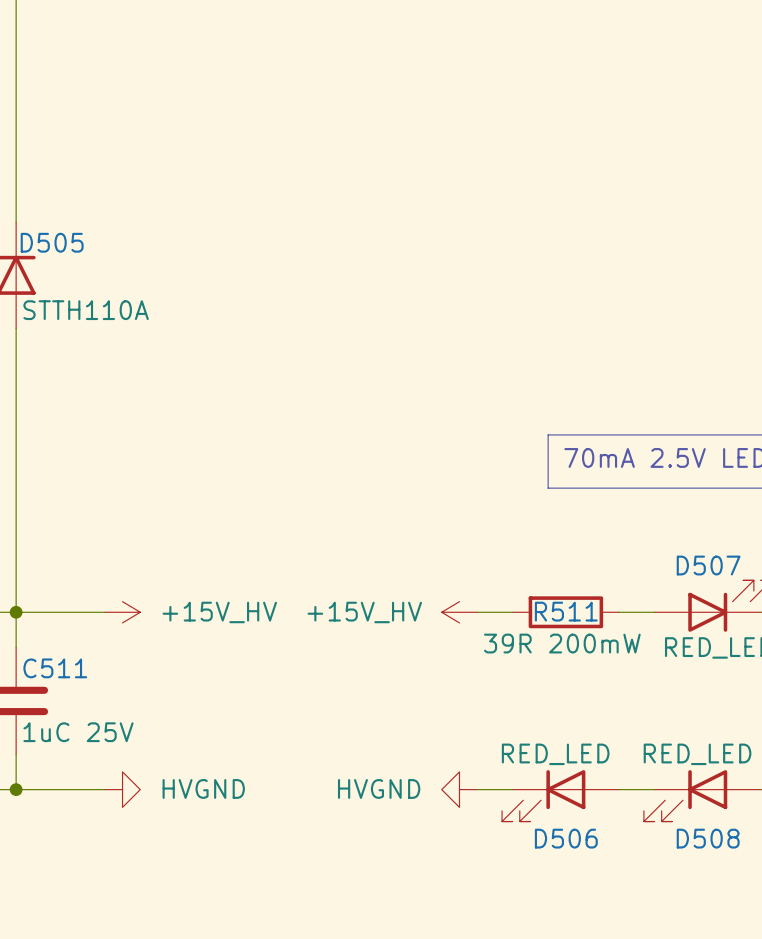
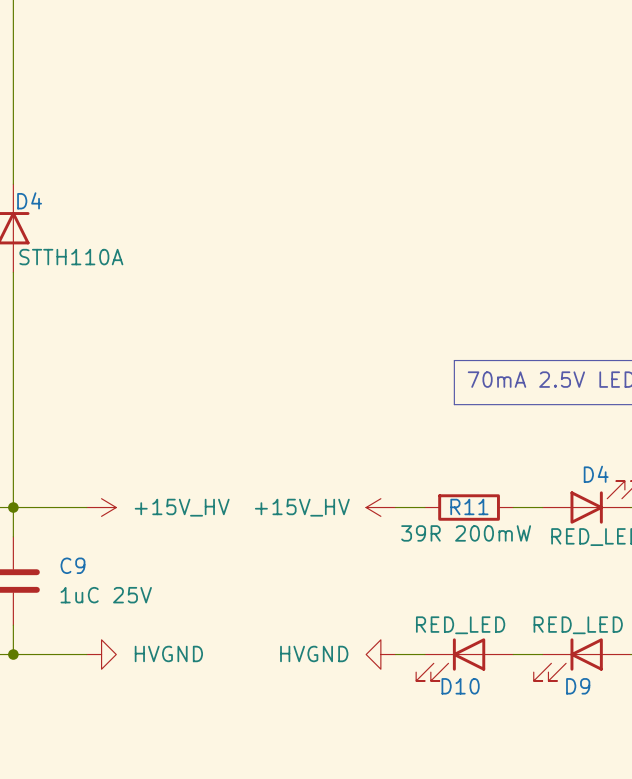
D505 name: D505 (52, 242) -> D4 (29, 200)
D507 name: D507 (708, 565) -> D4 (596, 474)
R511 name: R511 (566, 611) -> R11 (469, 506)
C511 name: C511 (55, 668) -> C9 (72, 565)
C511 value position: 1uC 25V (78, 732) -> 1uC 25V (106, 595)
D506 name: D506 (566, 838) -> D10 (460, 686)
D508 name: D508 (708, 838) -> D9 (578, 686)

